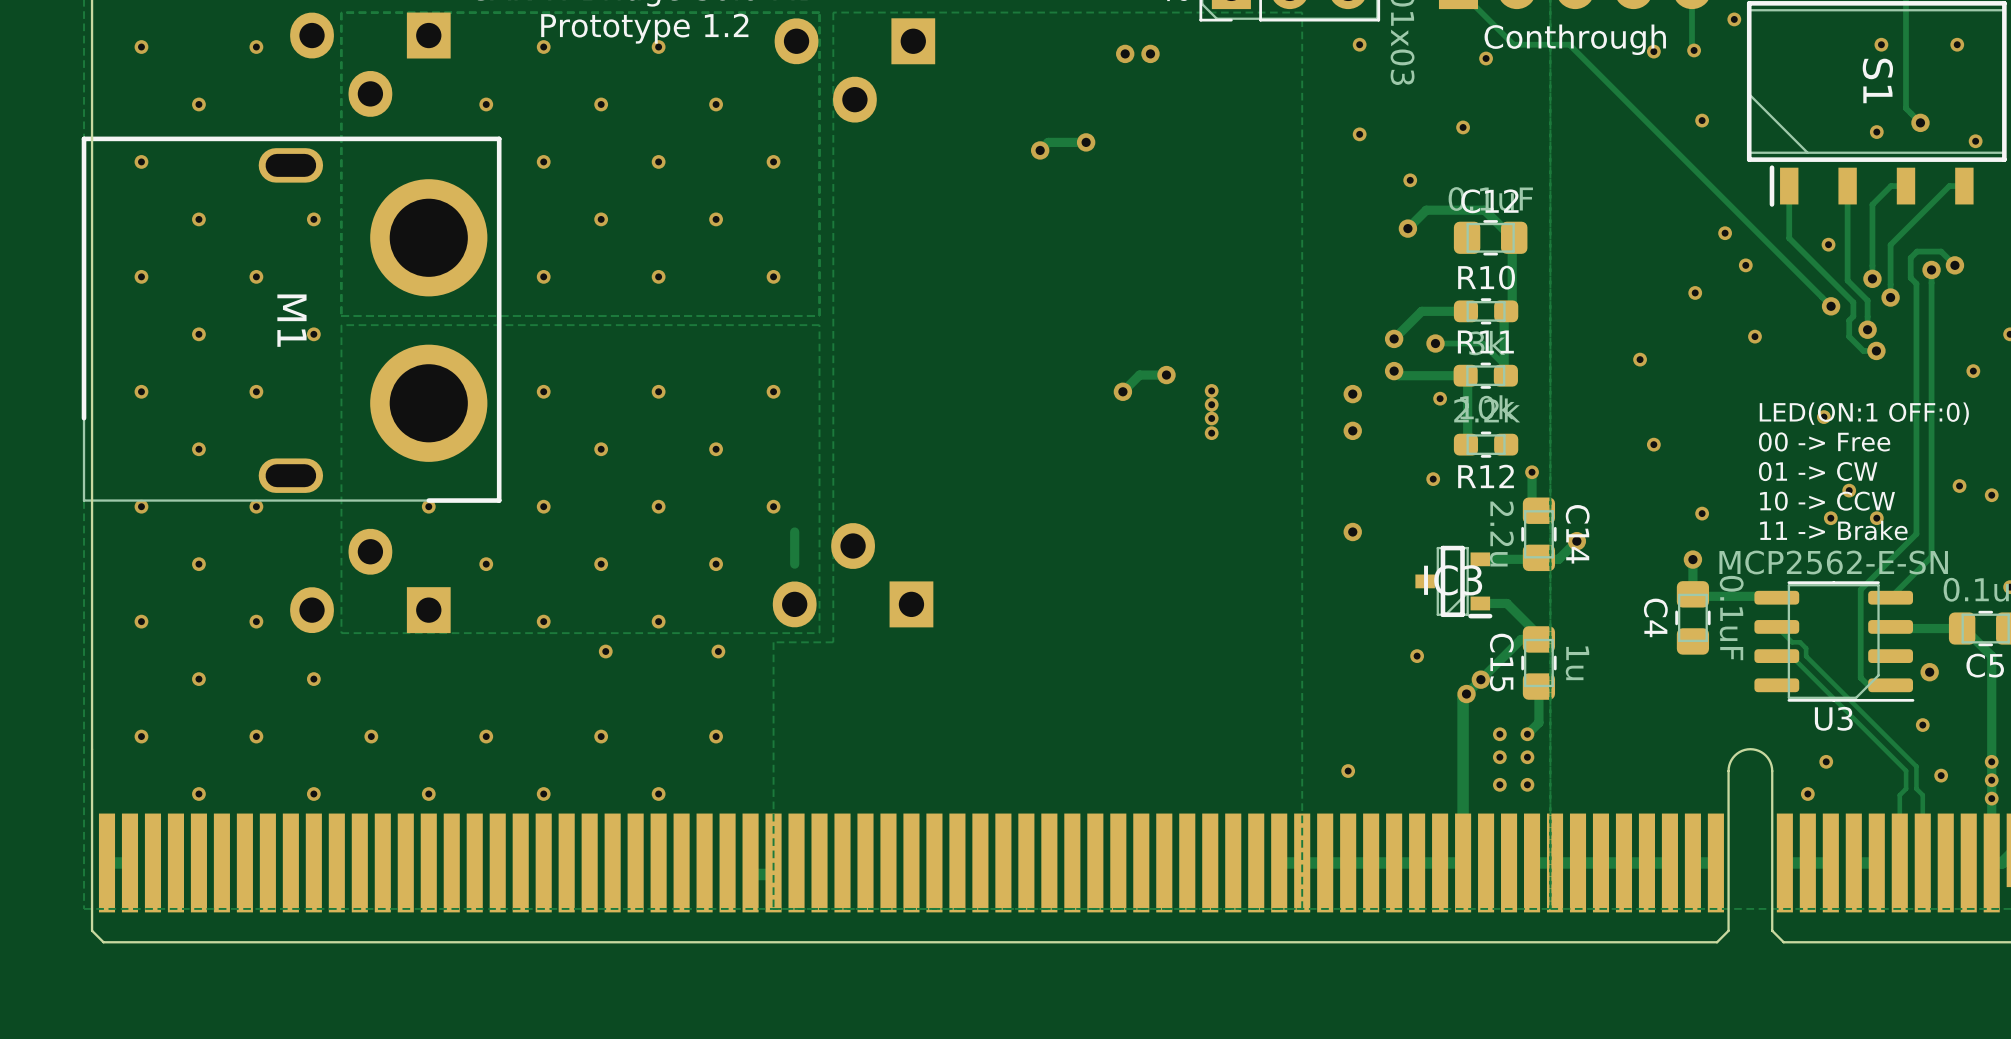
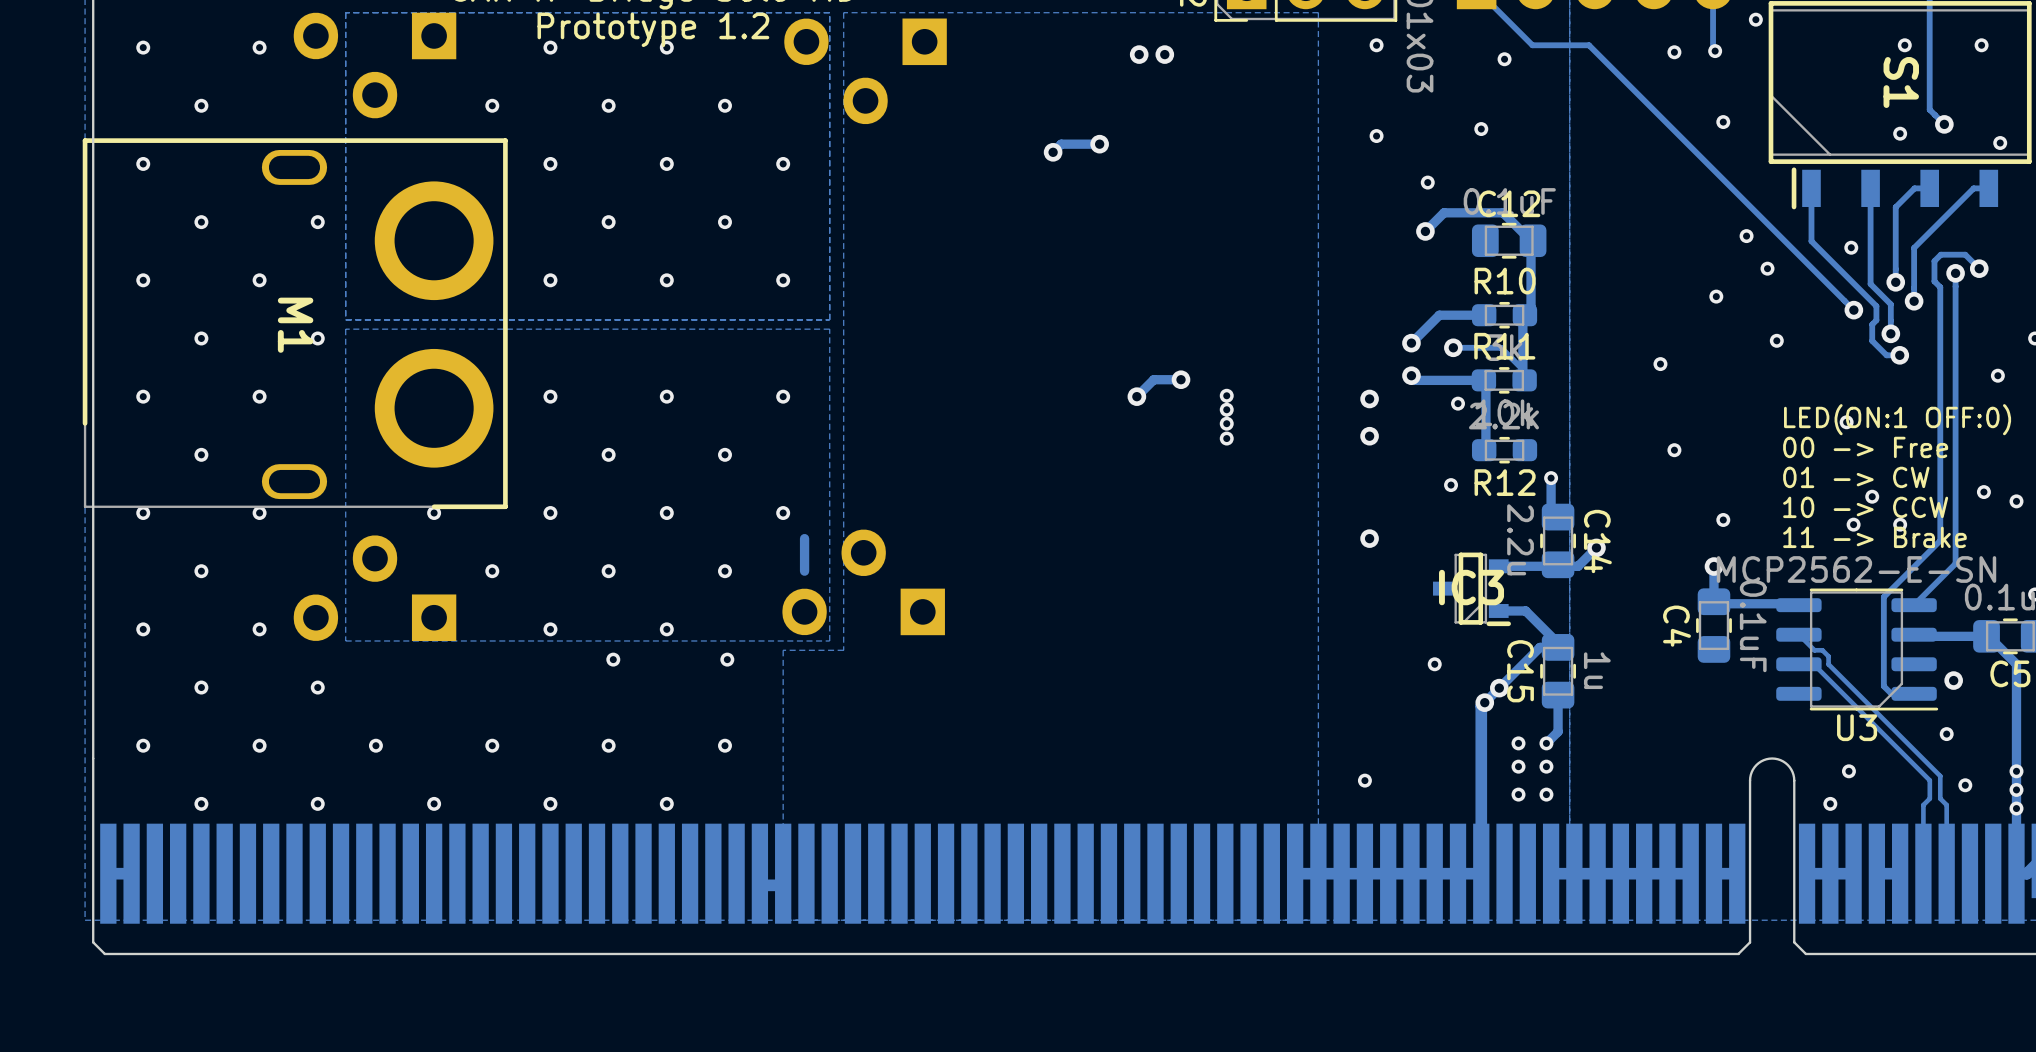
part value: Conthrough (1575, 39) -> none

